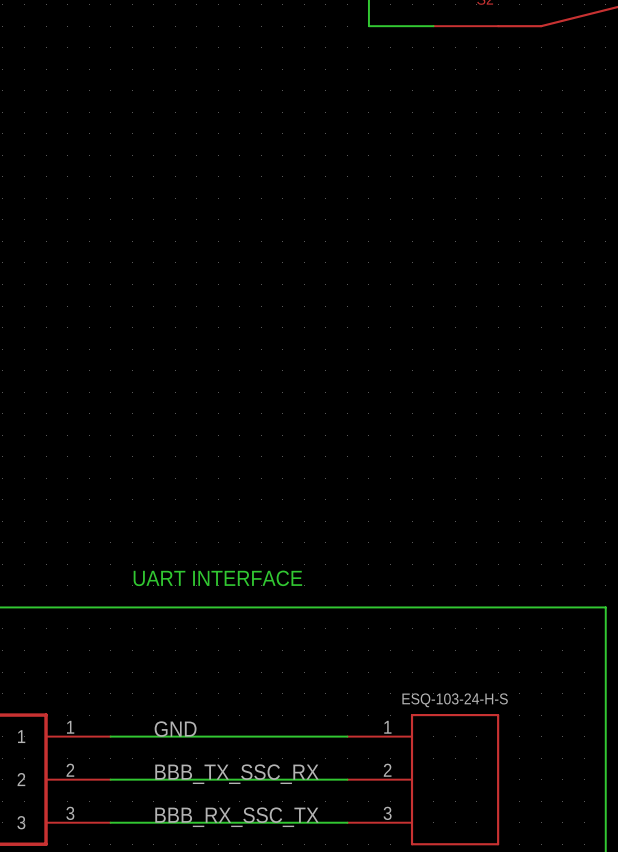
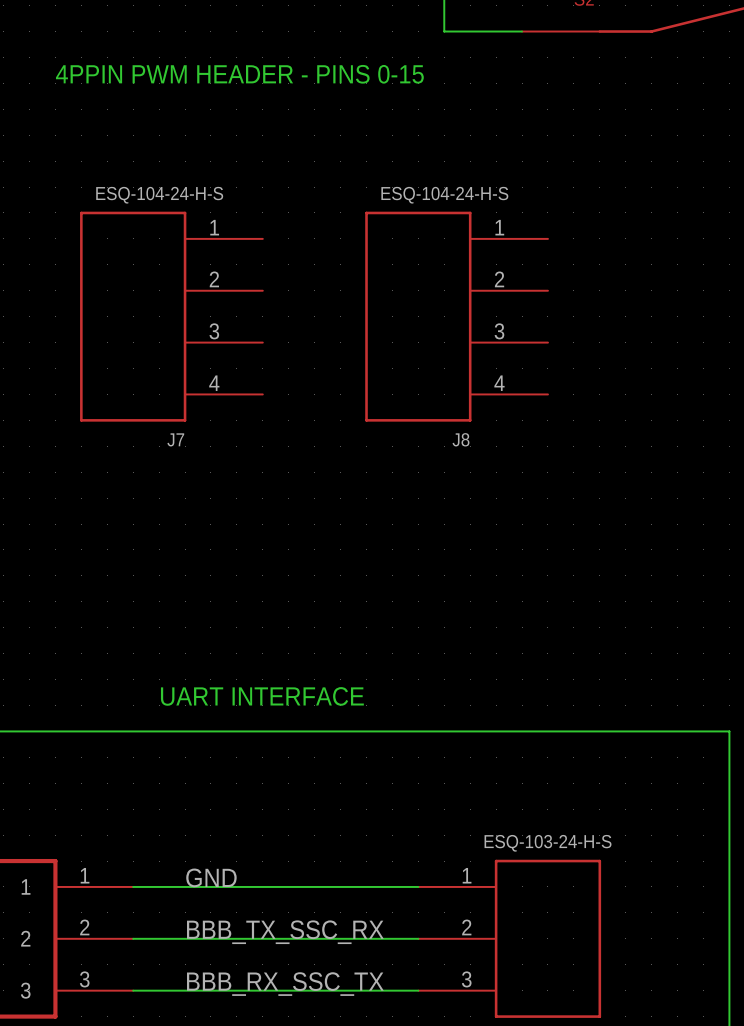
text: none -> 4PPIN PWM HEADER - PINS 0-15 (239, 74)
J7: none -> ESQ-104-24-H-S (171, 316)
J8: none -> ESQ-104-24-H-S (456, 316)

